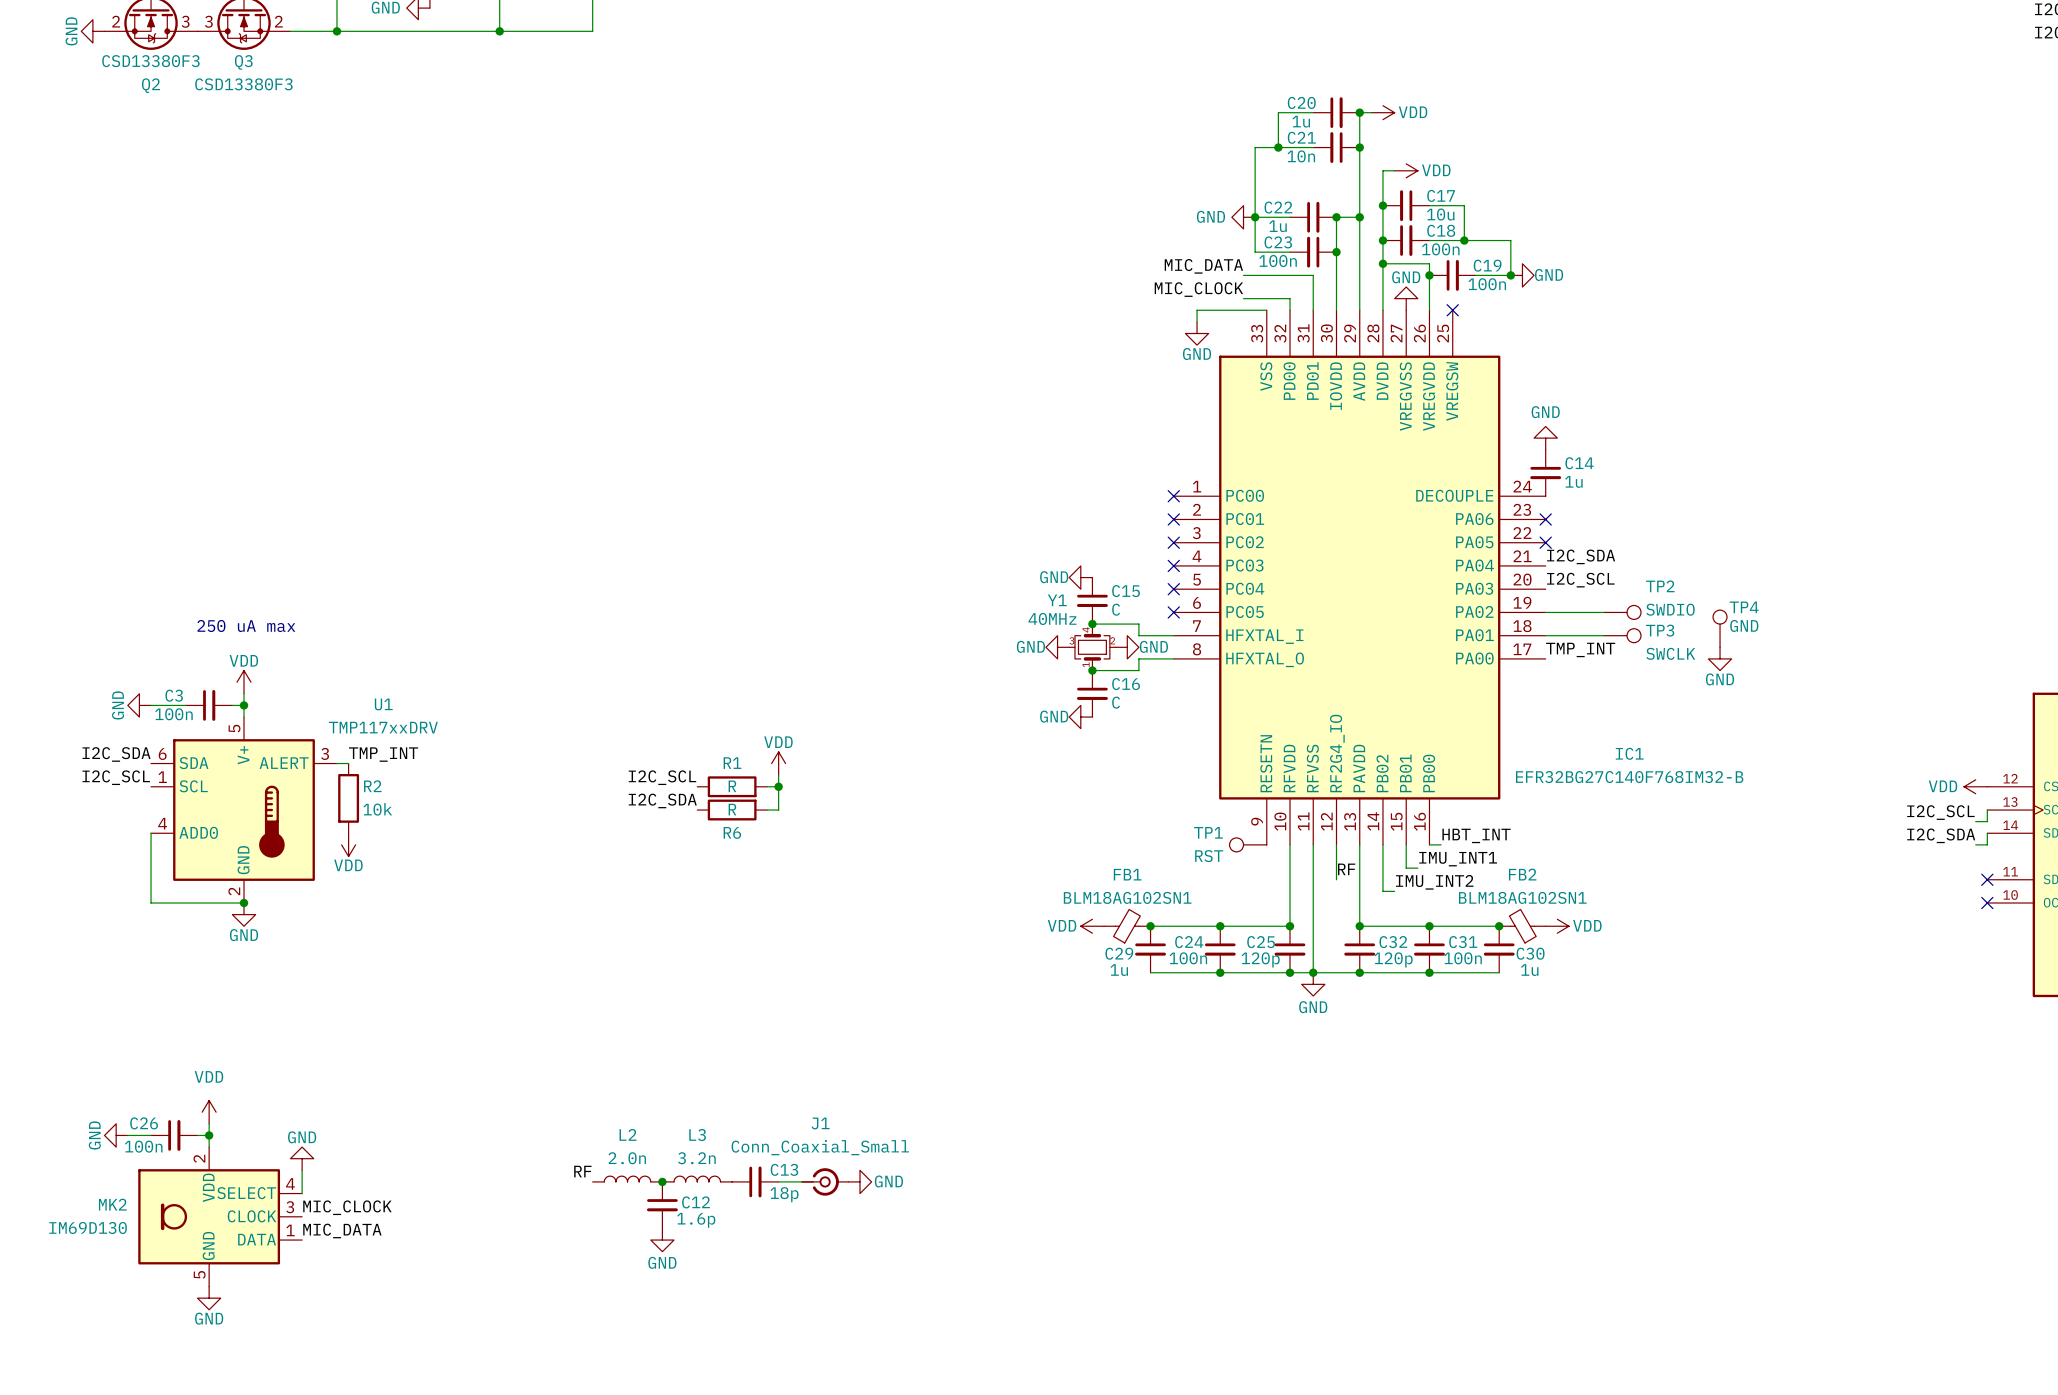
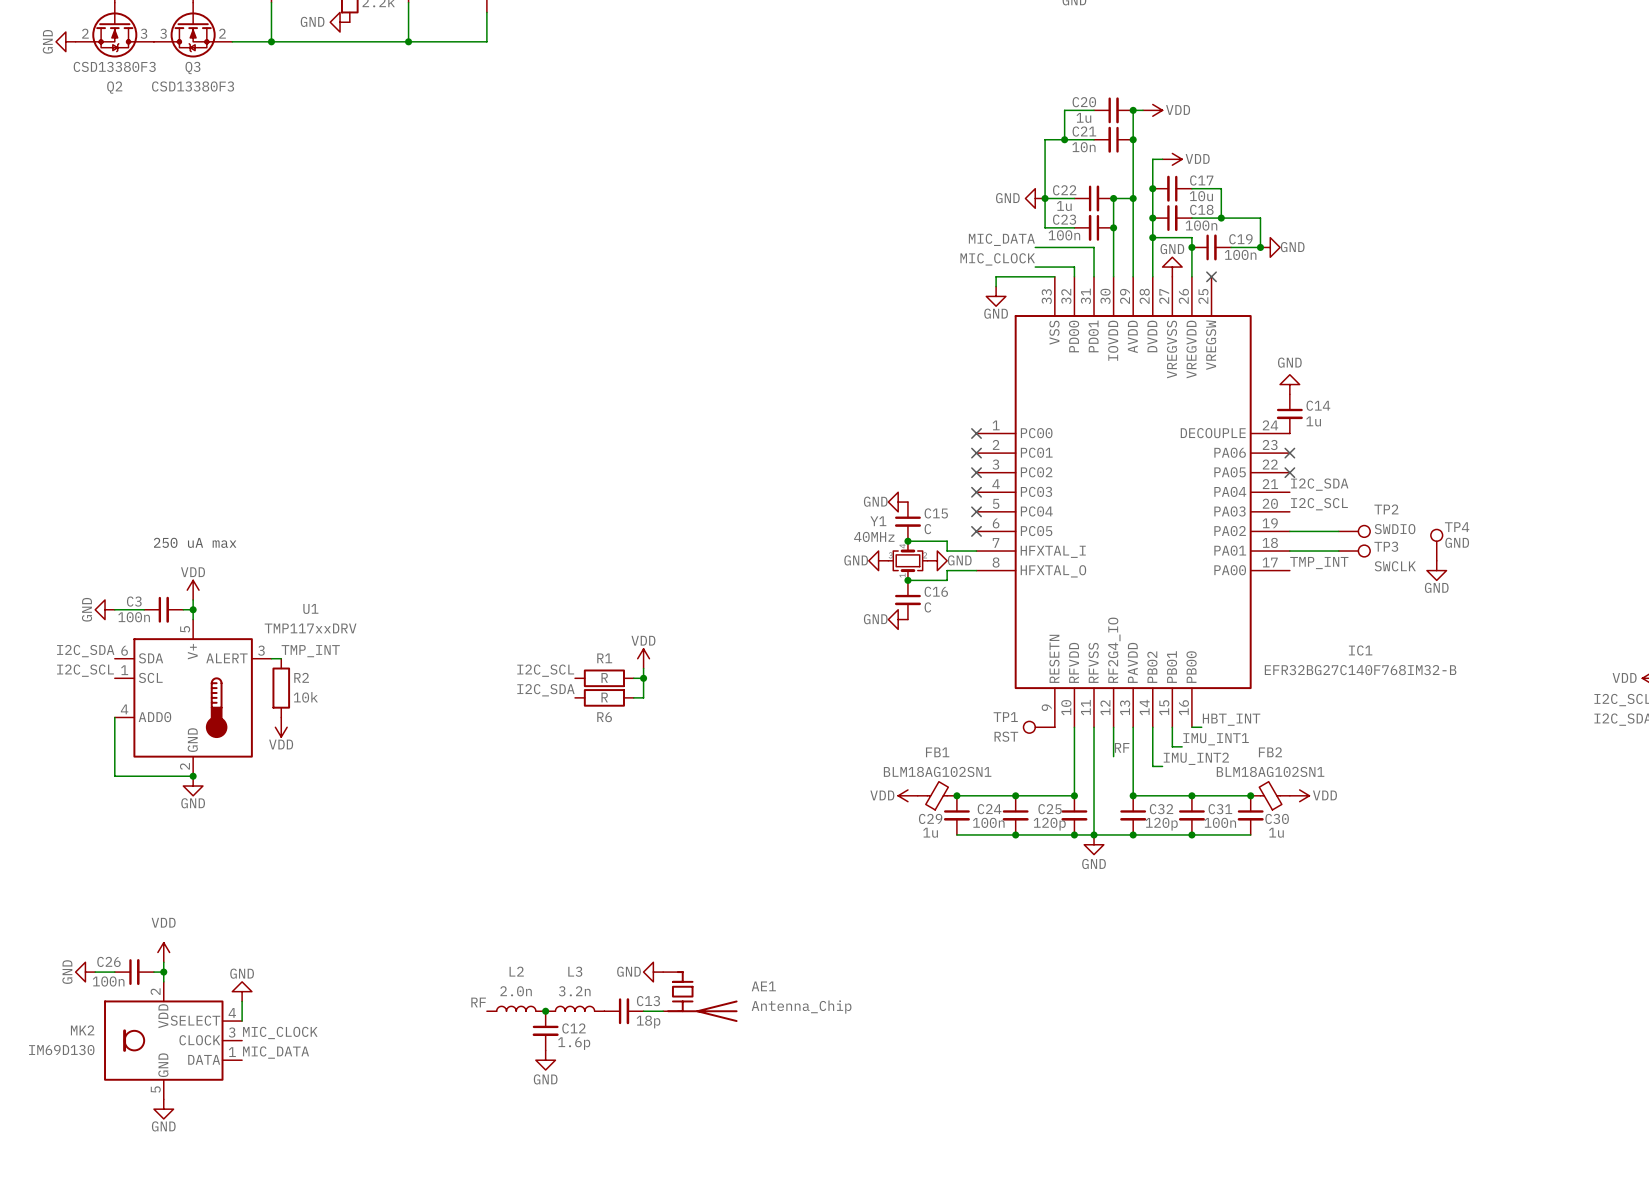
AE1: none -> Antenna_Chip (700, 996)
J1: Conn_Coaxial_Small (825, 1181) -> none
power symbol rotation: 0° (859, 1181) -> 180° (653, 972)
power symbol position: GND (859, 1181) -> GND (653, 972)

